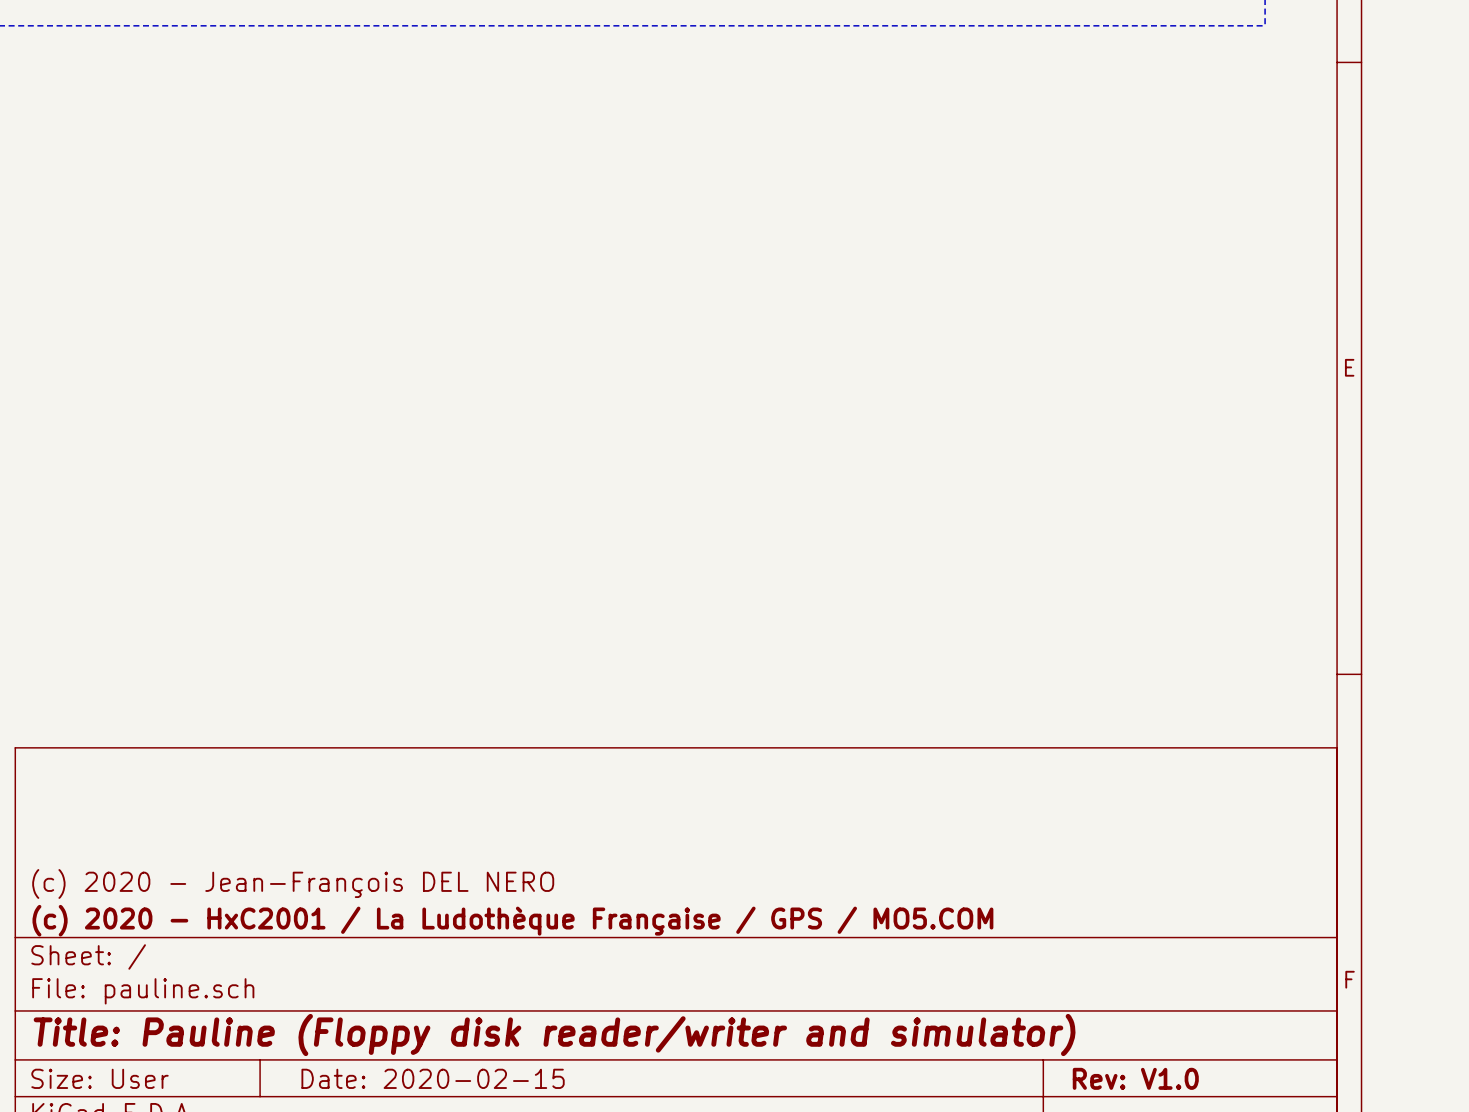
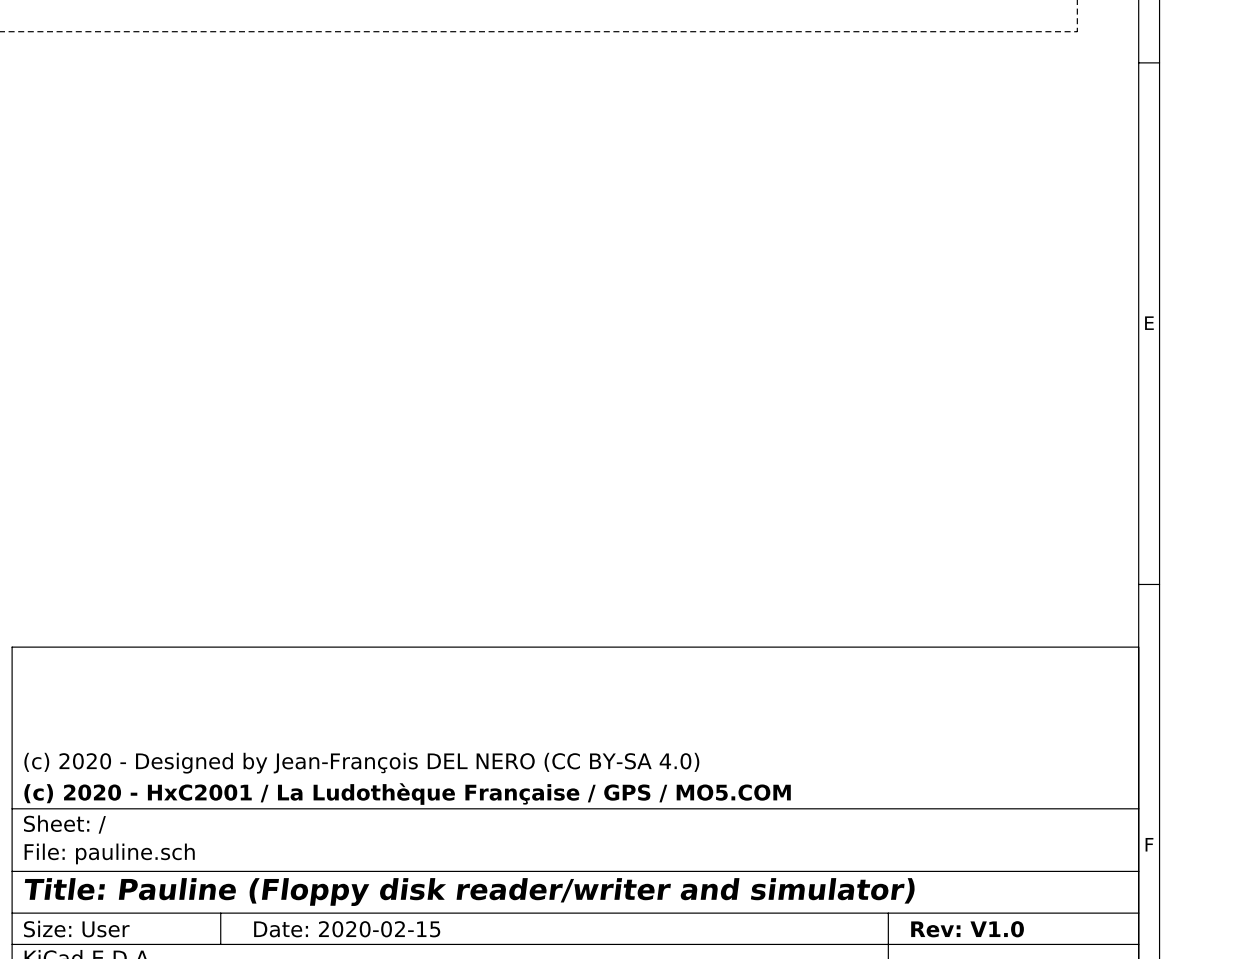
title block: (c) 2020 - Jean-François DEL NERO (293, 883) -> (c) 2020 - Designed by Jean-François DEL NERO (CC BY-SA 4.0) (361, 763)

